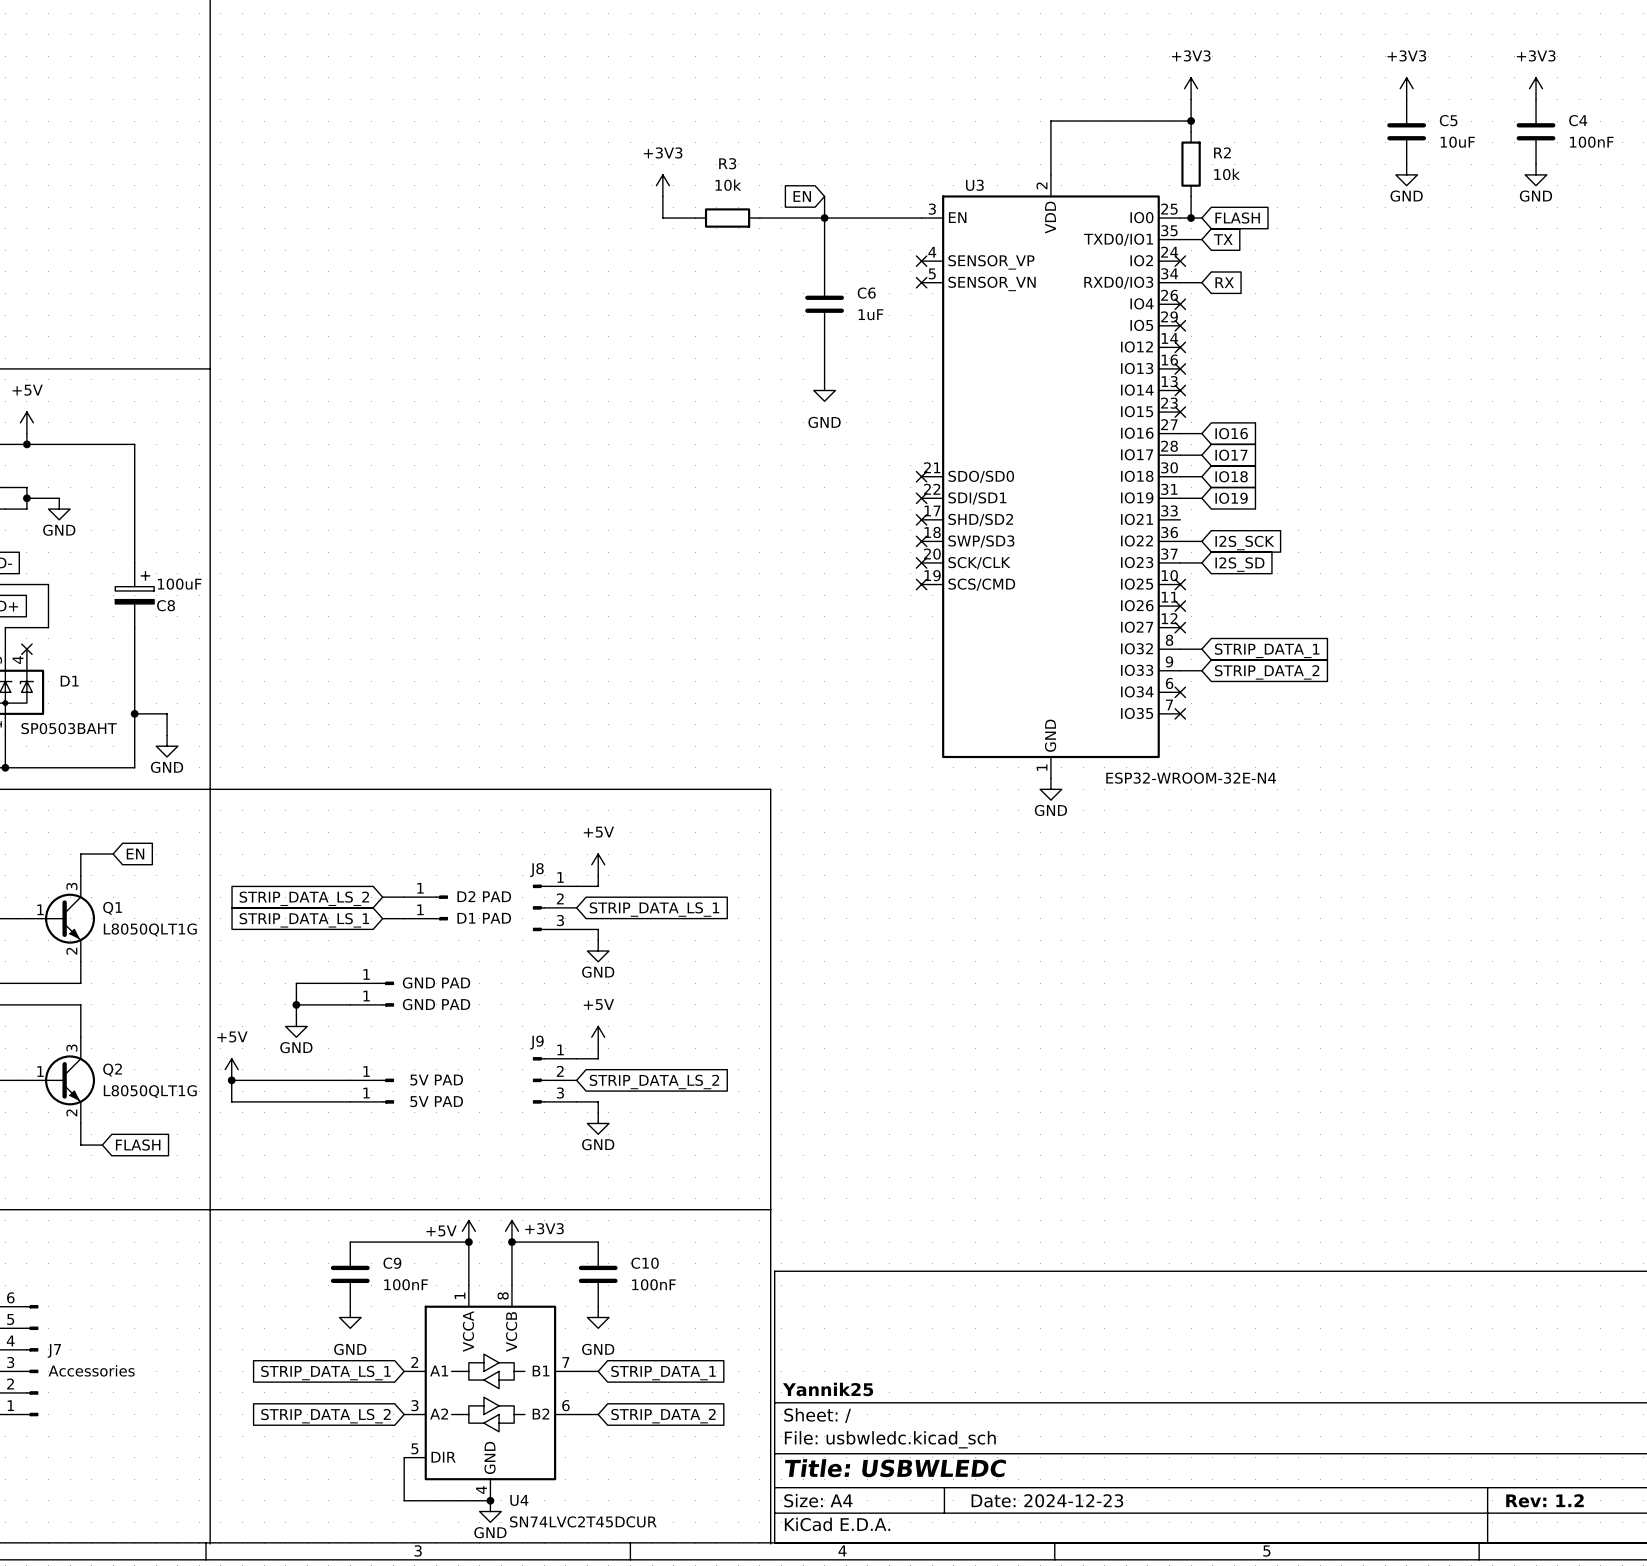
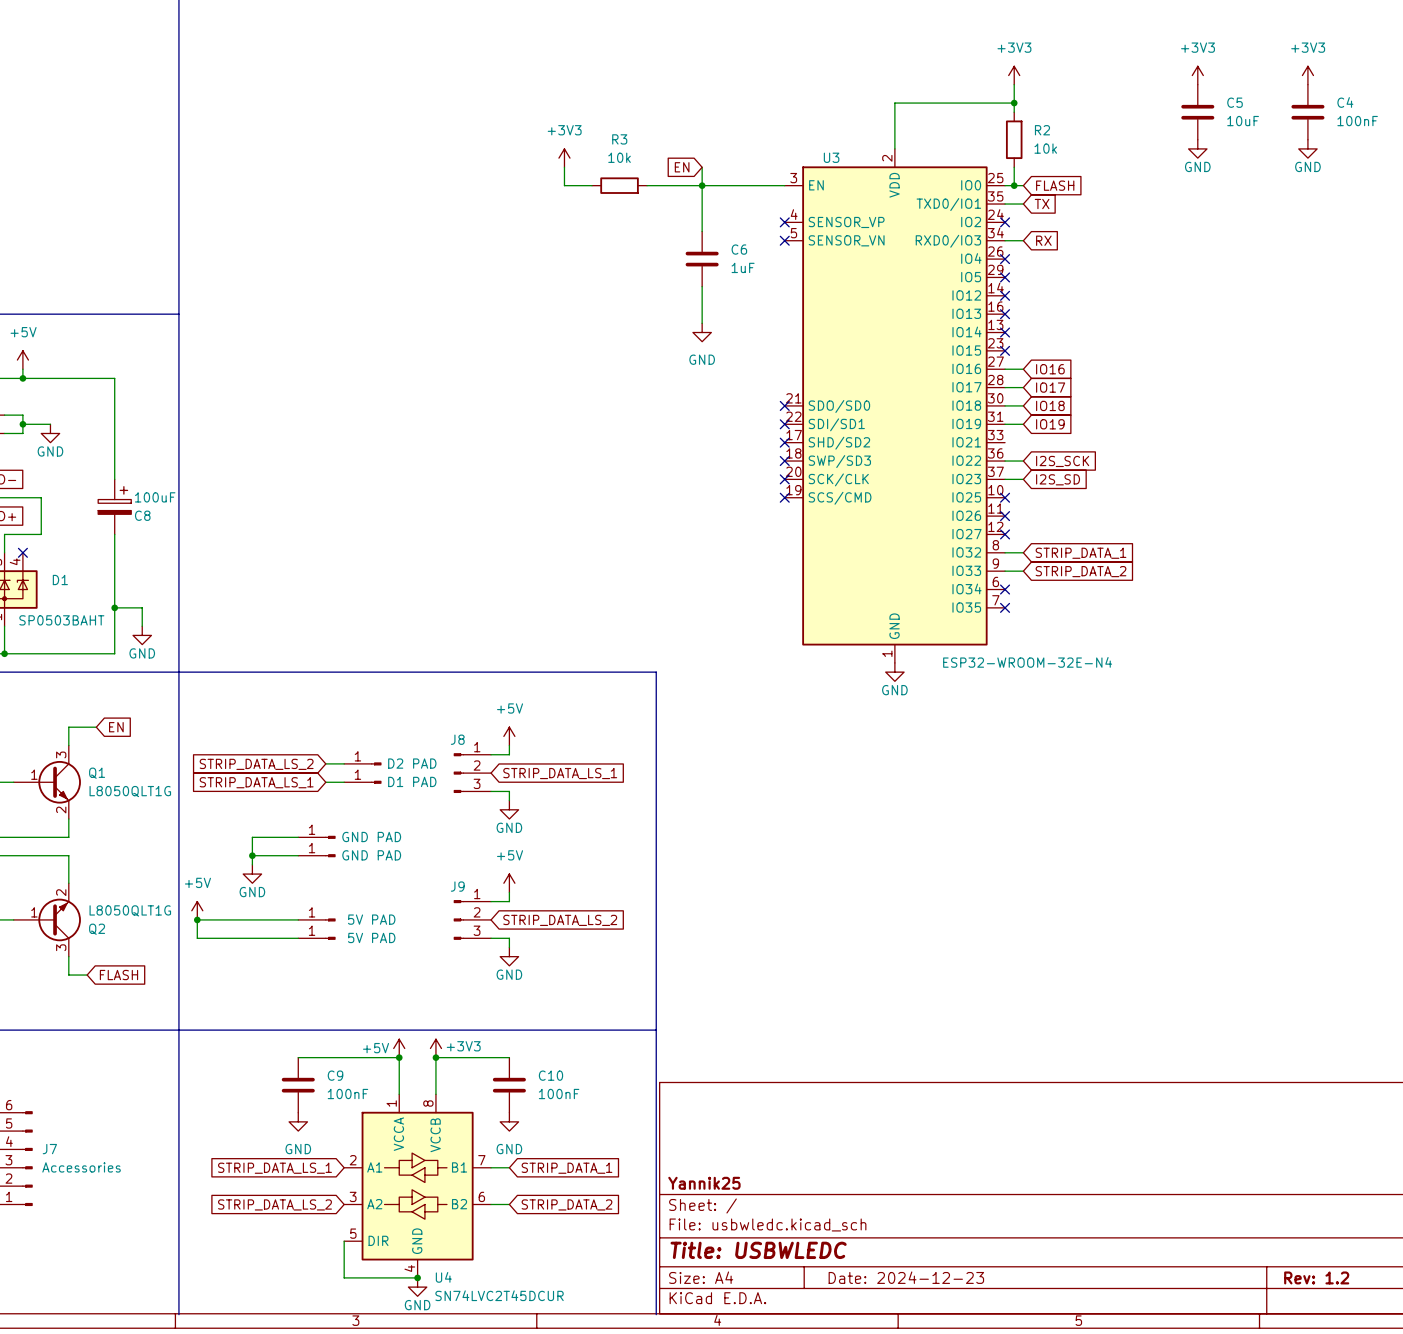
Q2 flip: as is (70, 1080) -> up-down (59, 919)

